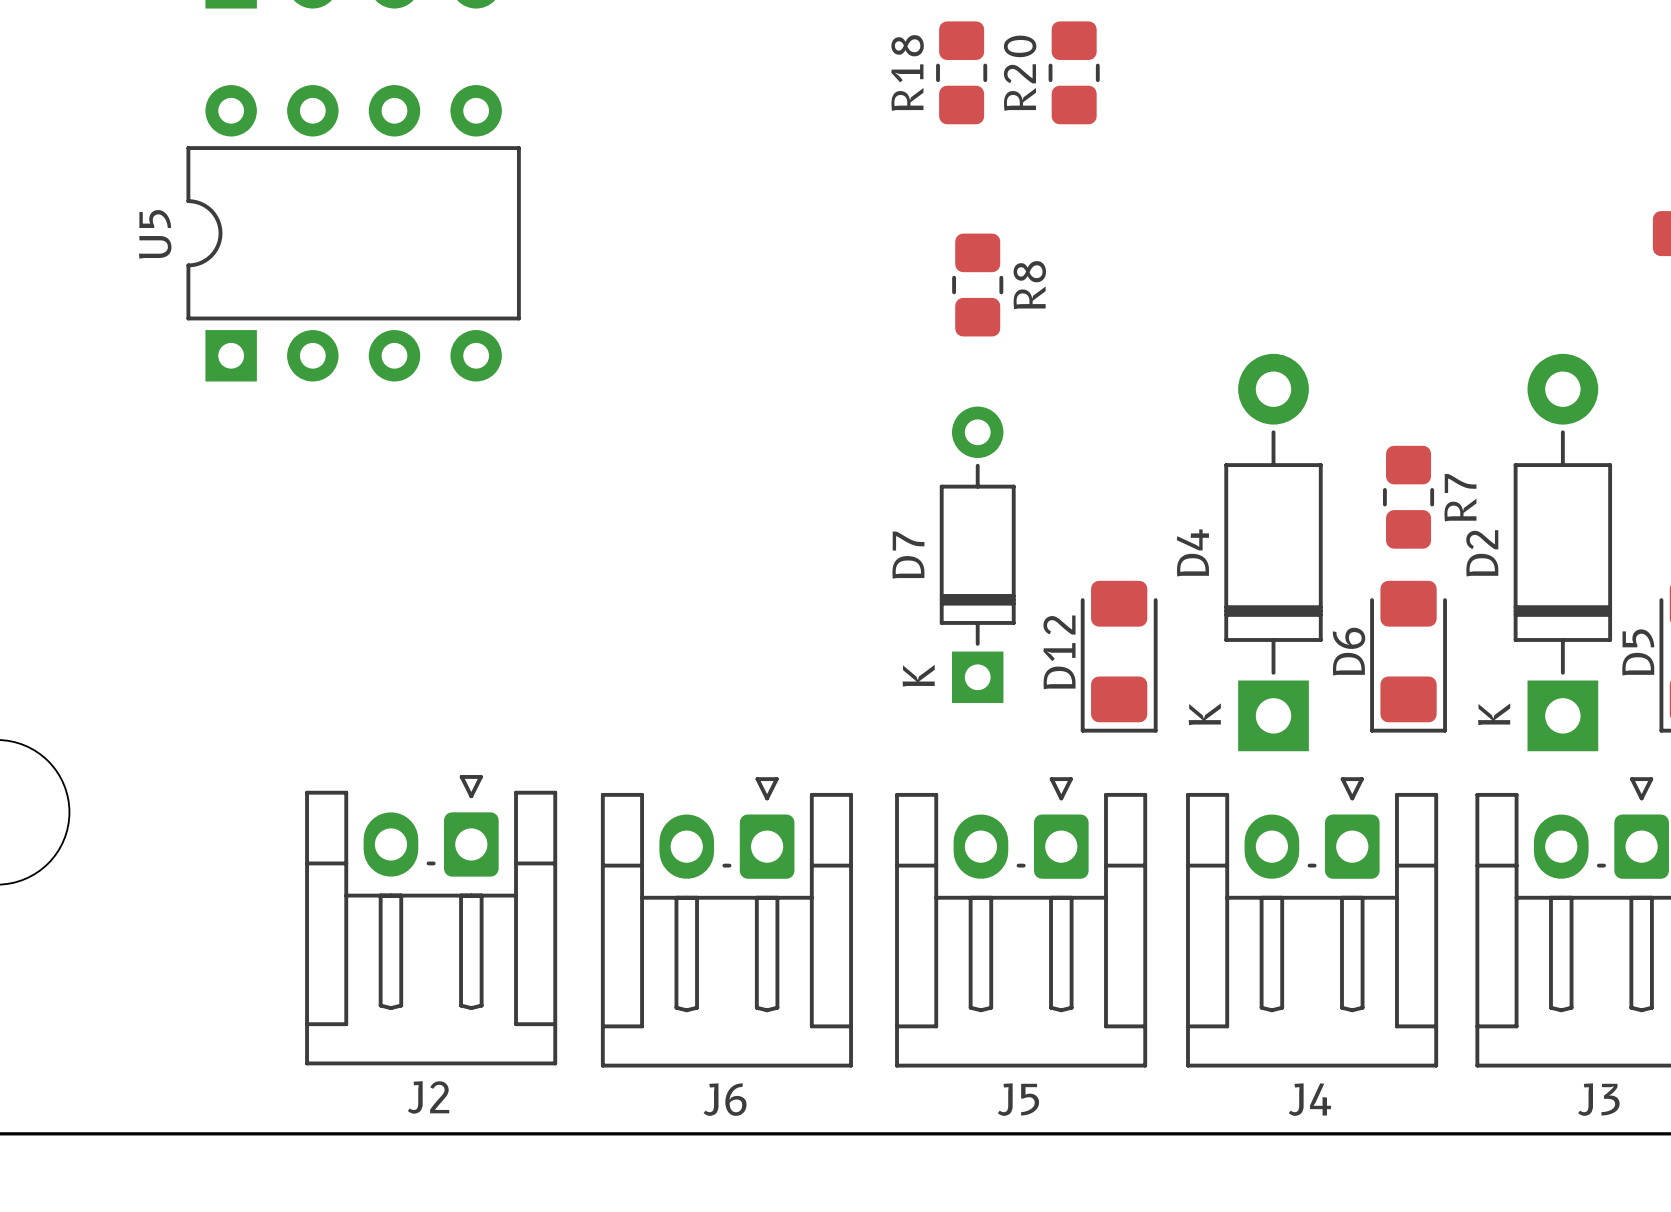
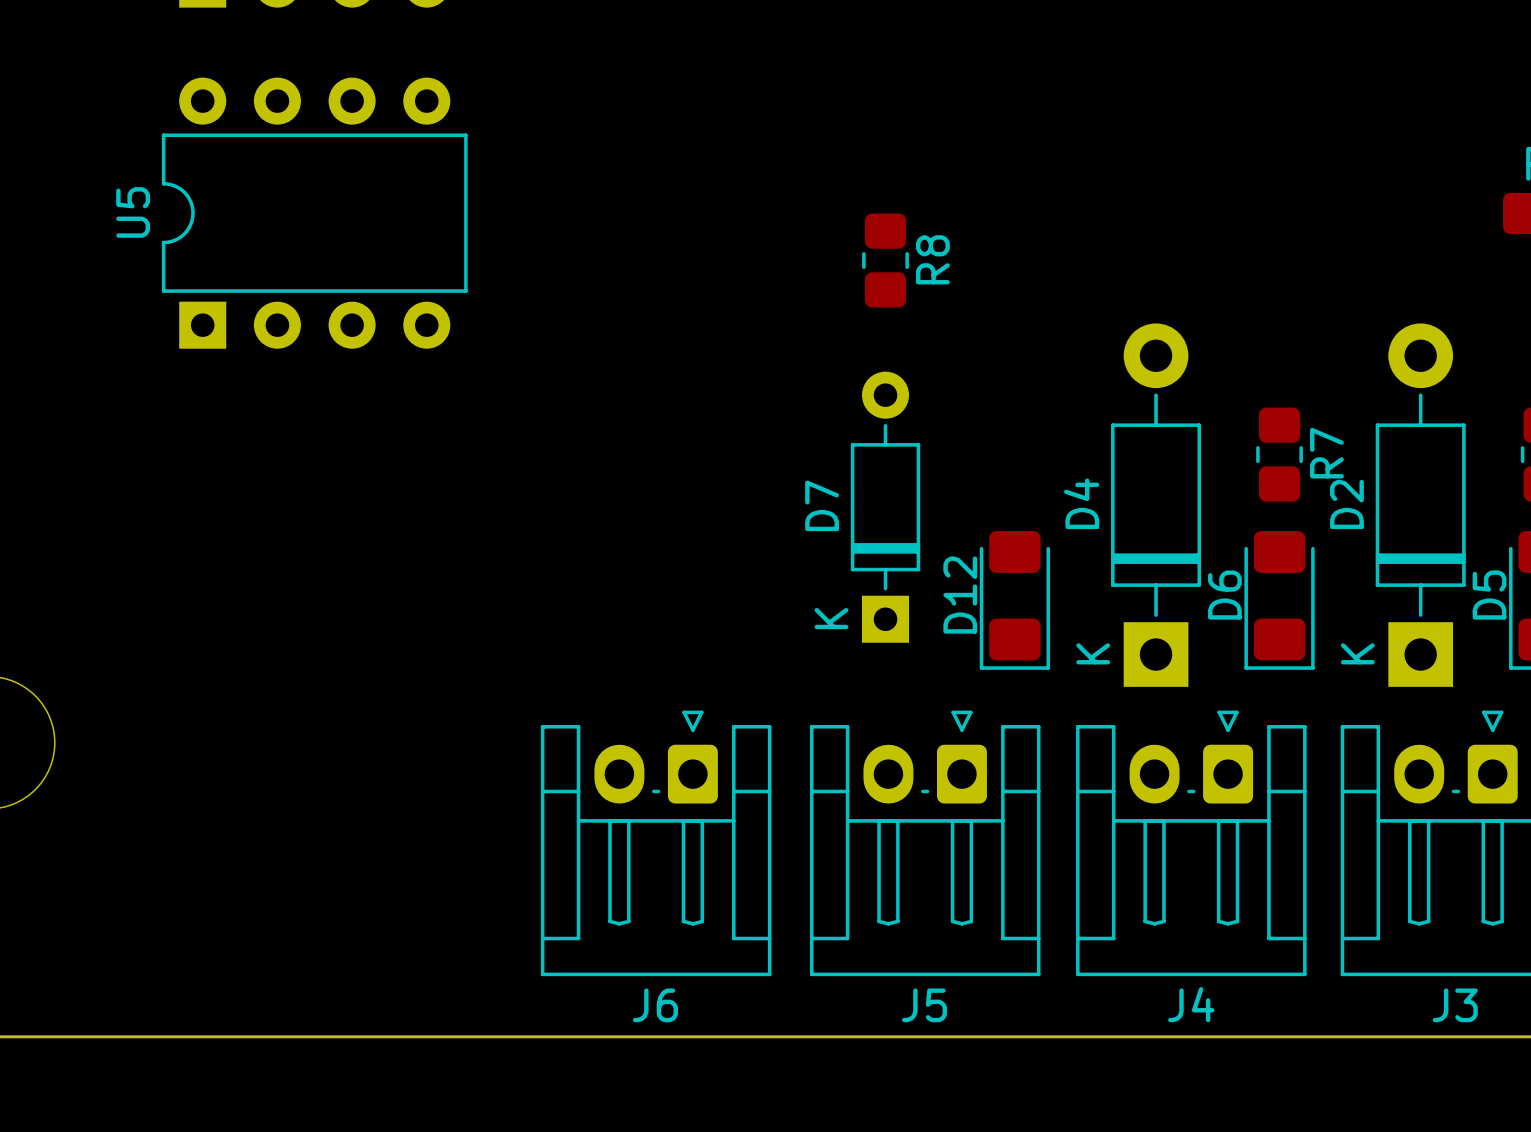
R18: (961, 72) -> none
R20: (1074, 72) -> none
J2: (431, 920) -> none

